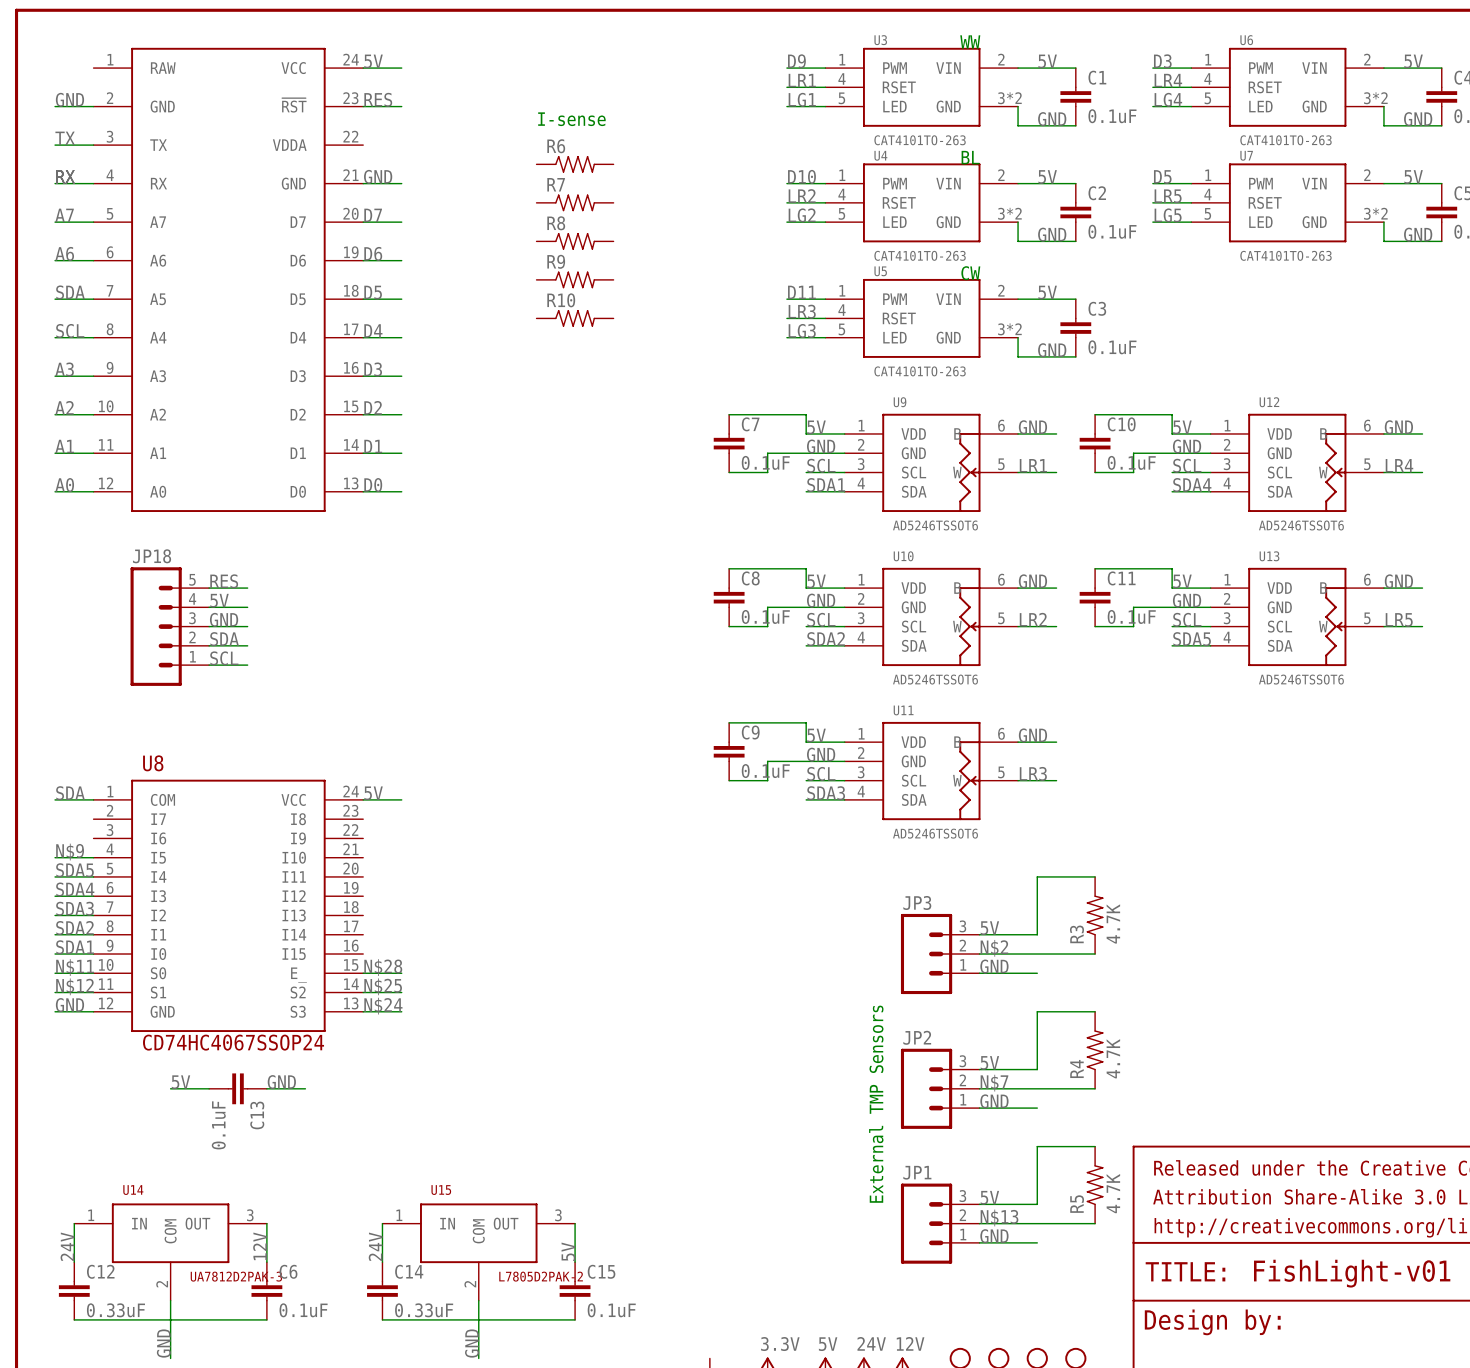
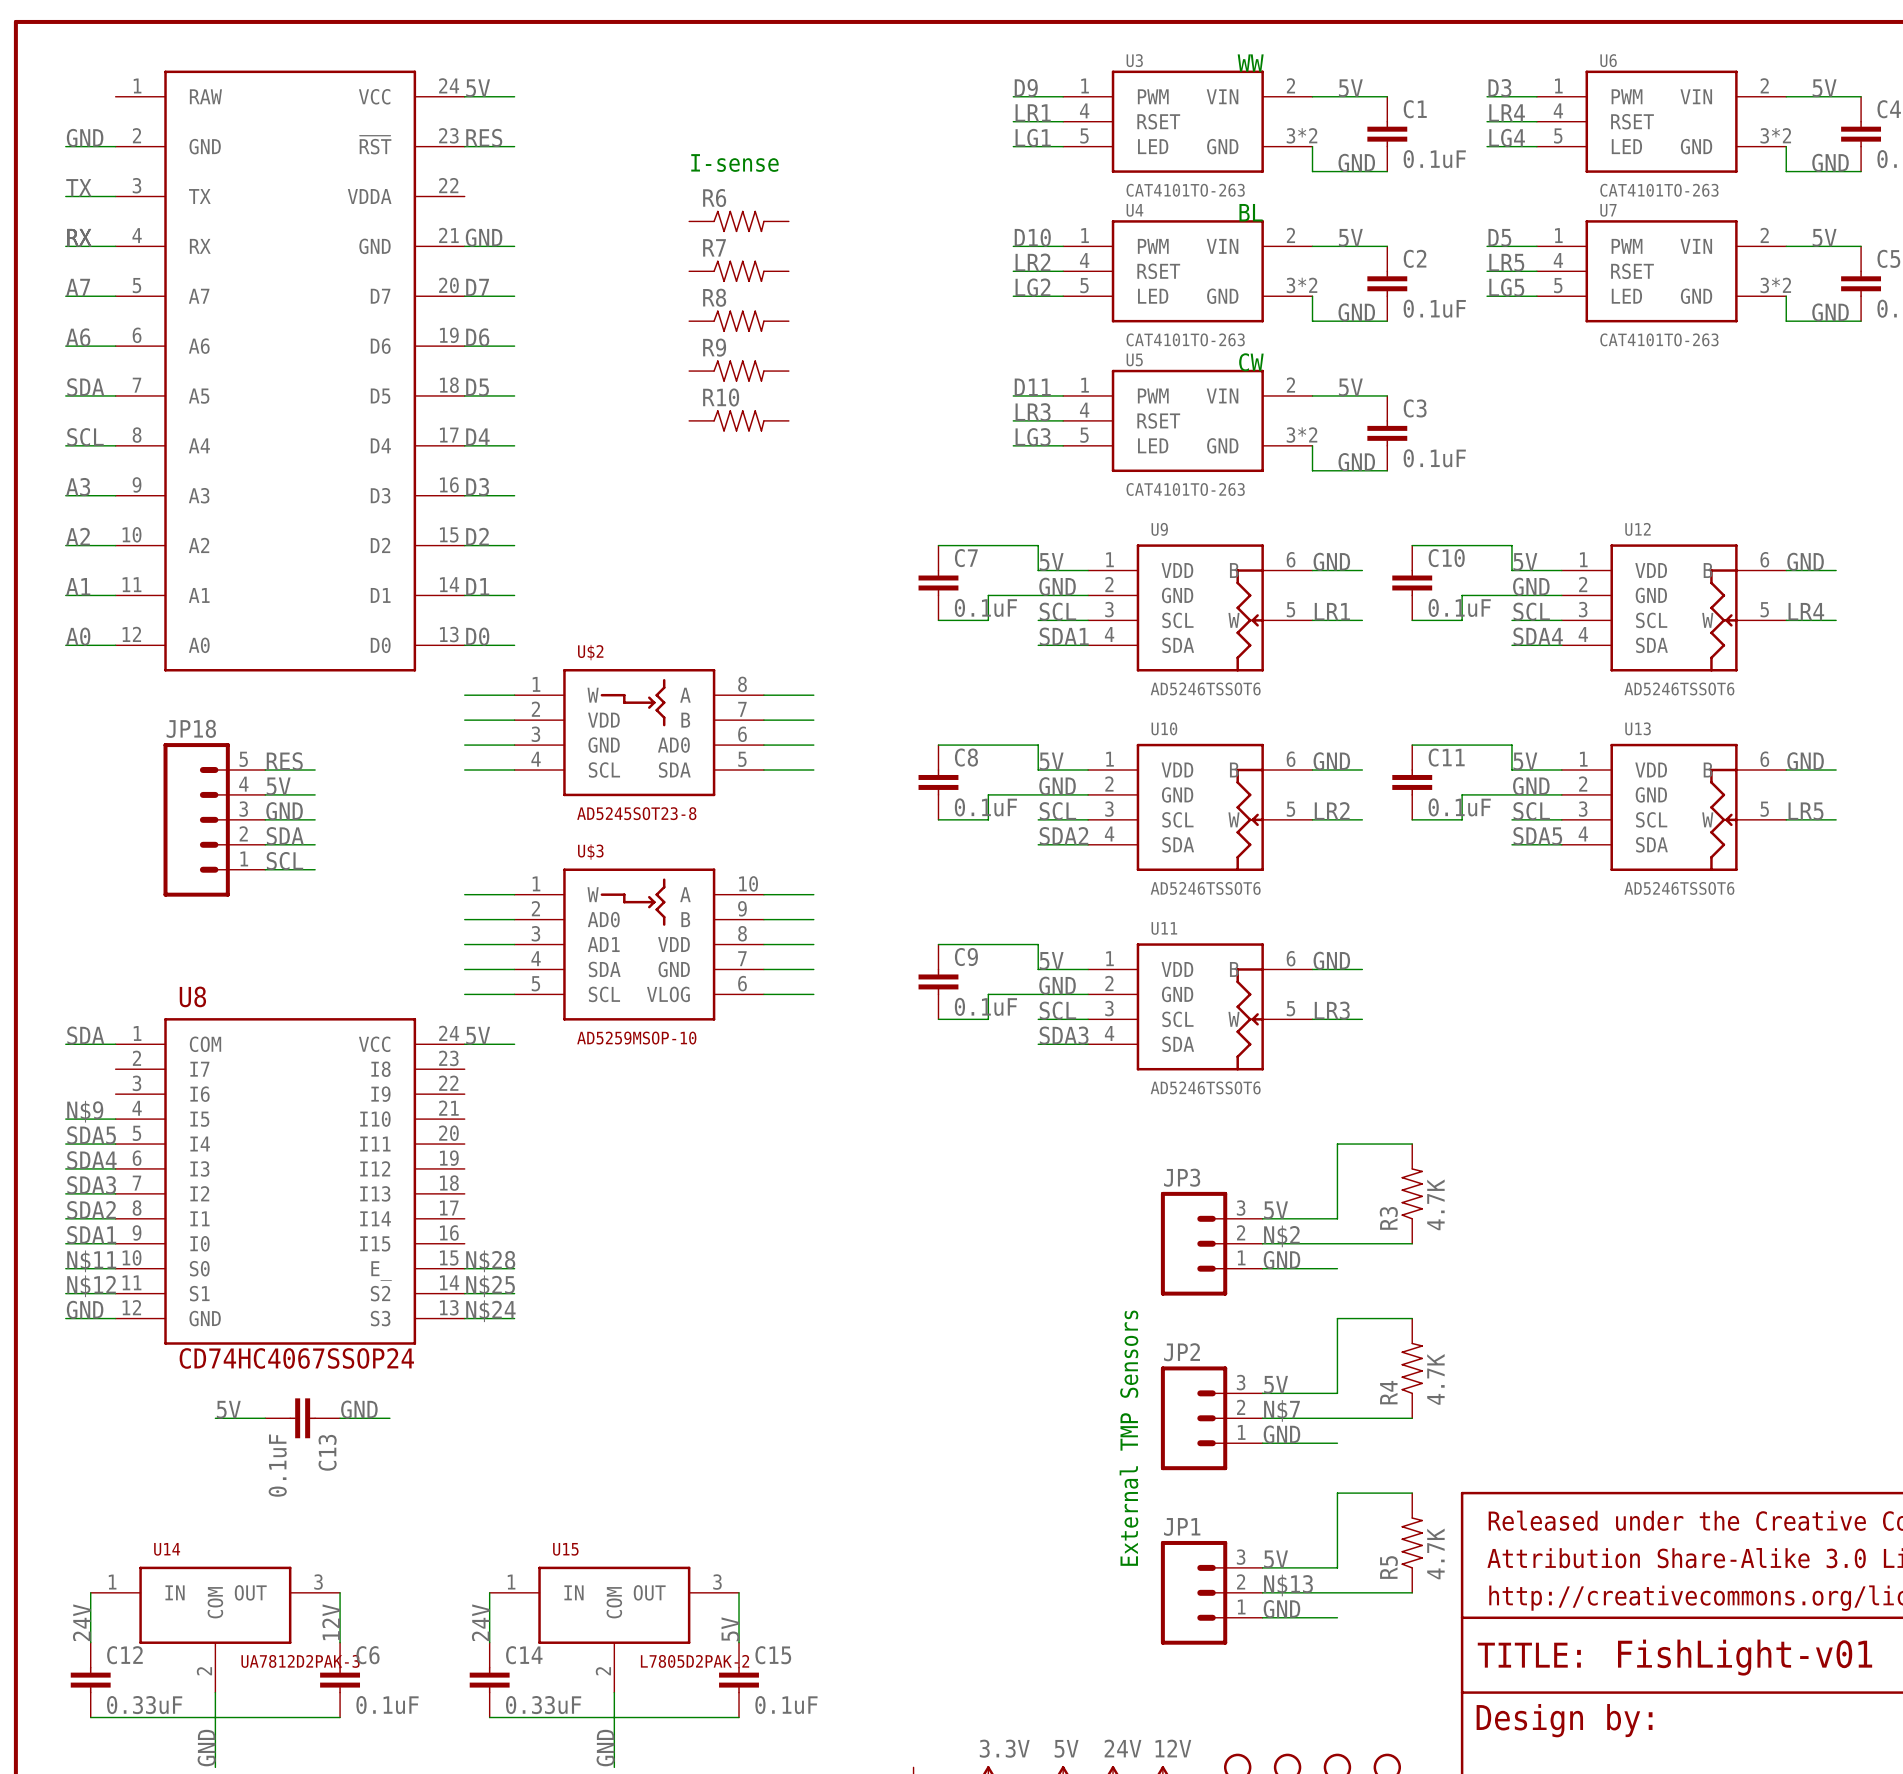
wire: none -> (464, 695) (514, 695)
wire: none -> (763, 695) (813, 695)
wire: none -> (464, 720) (514, 720)
wire: none -> (763, 720) (813, 720)
U$2: none -> AD5245SOT23-8 (639, 732)
wire: none -> (464, 745) (514, 745)
wire: none -> (763, 745) (813, 745)
wire: none -> (464, 770) (514, 770)
wire: none -> (763, 770) (813, 770)
wire: none -> (464, 894) (514, 894)
wire: none -> (763, 894) (813, 894)
wire: none -> (464, 919) (514, 919)
wire: none -> (763, 919) (813, 919)
wire: none -> (464, 944) (514, 944)
U$3: none -> AD5259MSOP-10 (639, 944)
wire: none -> (763, 944) (813, 944)
wire: none -> (464, 969) (514, 969)
wire: none -> (763, 969) (813, 969)
wire: none -> (464, 994) (514, 994)
wire: none -> (763, 994) (813, 994)

